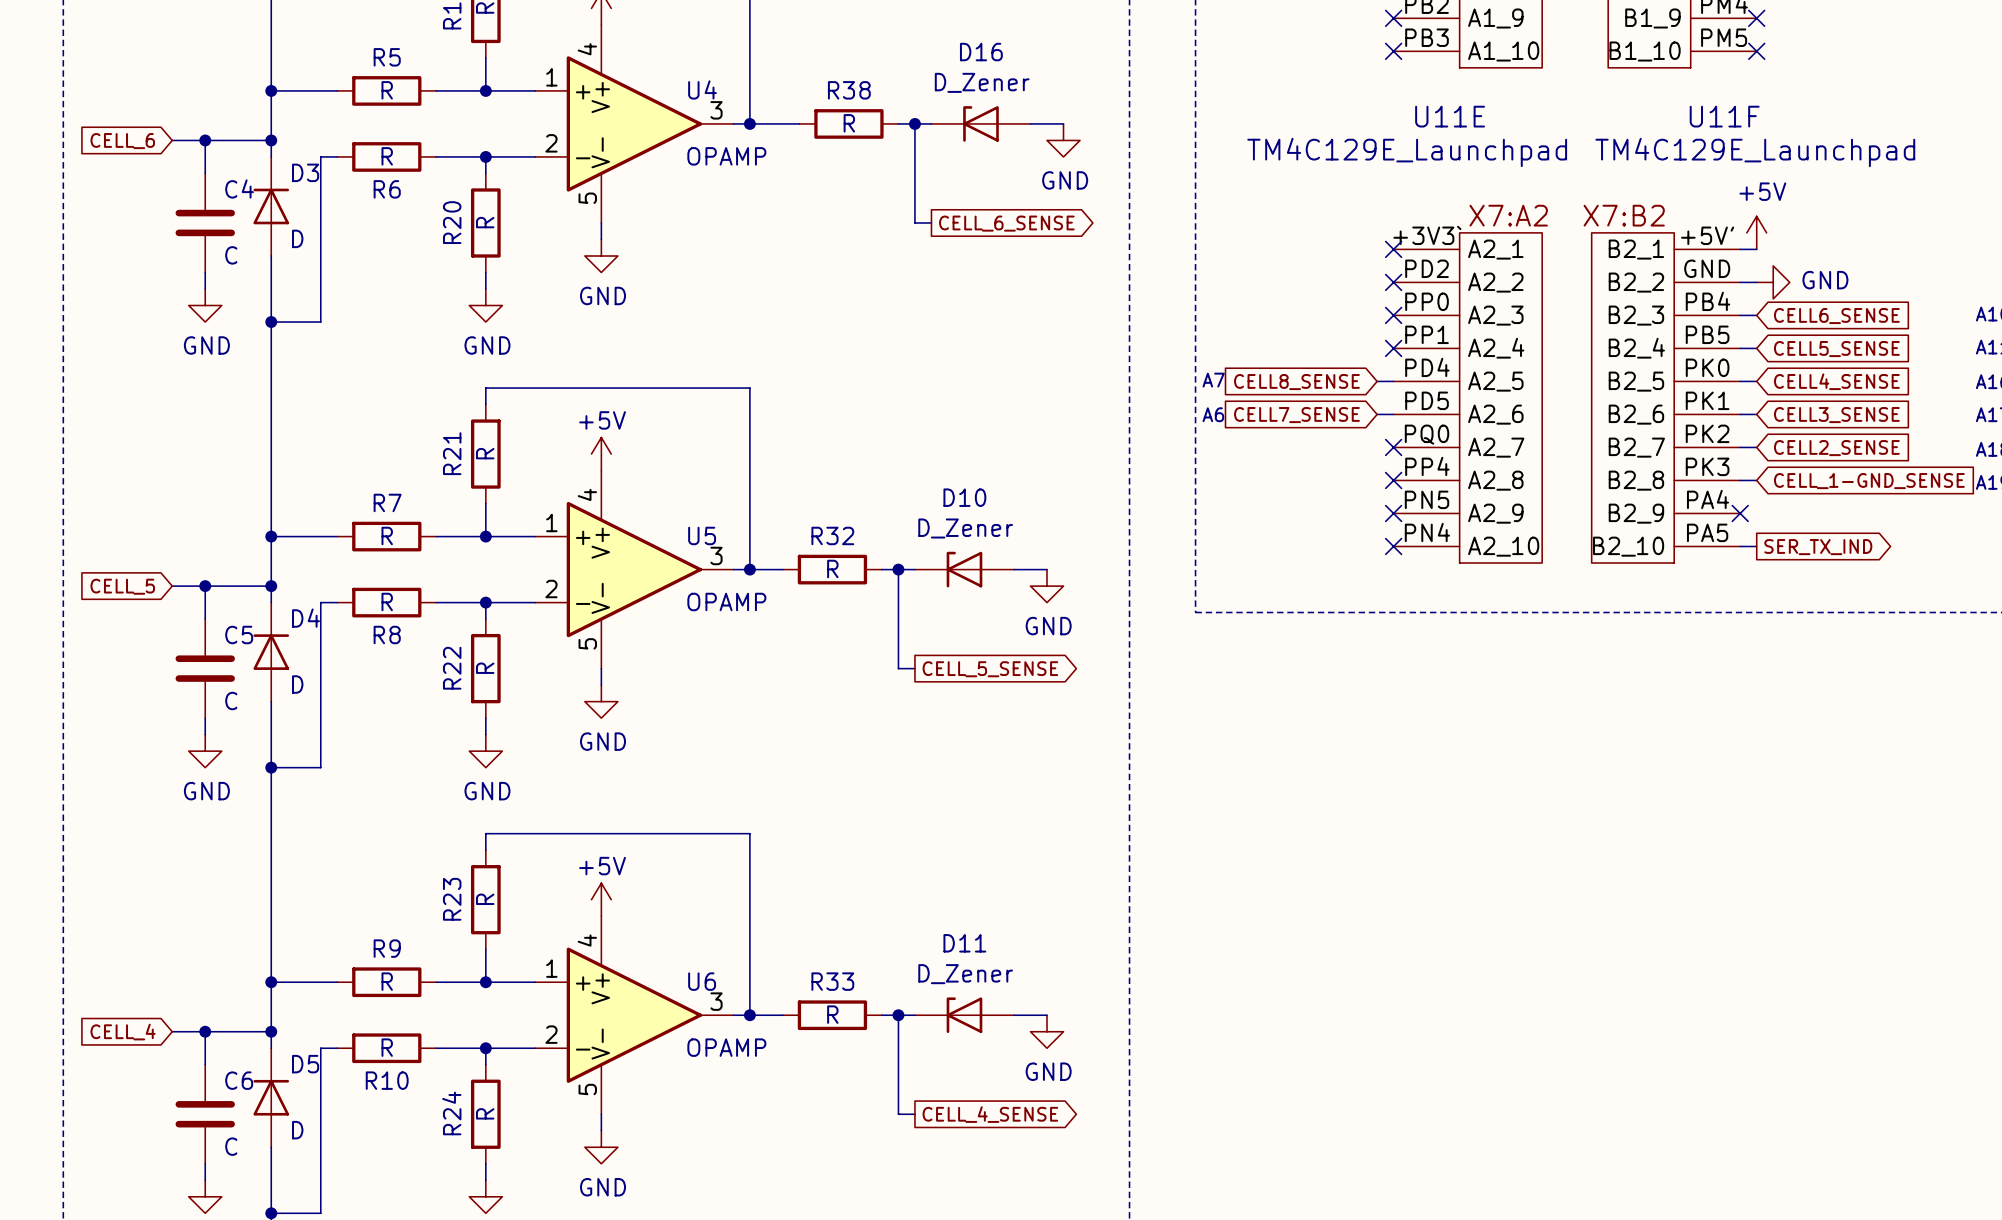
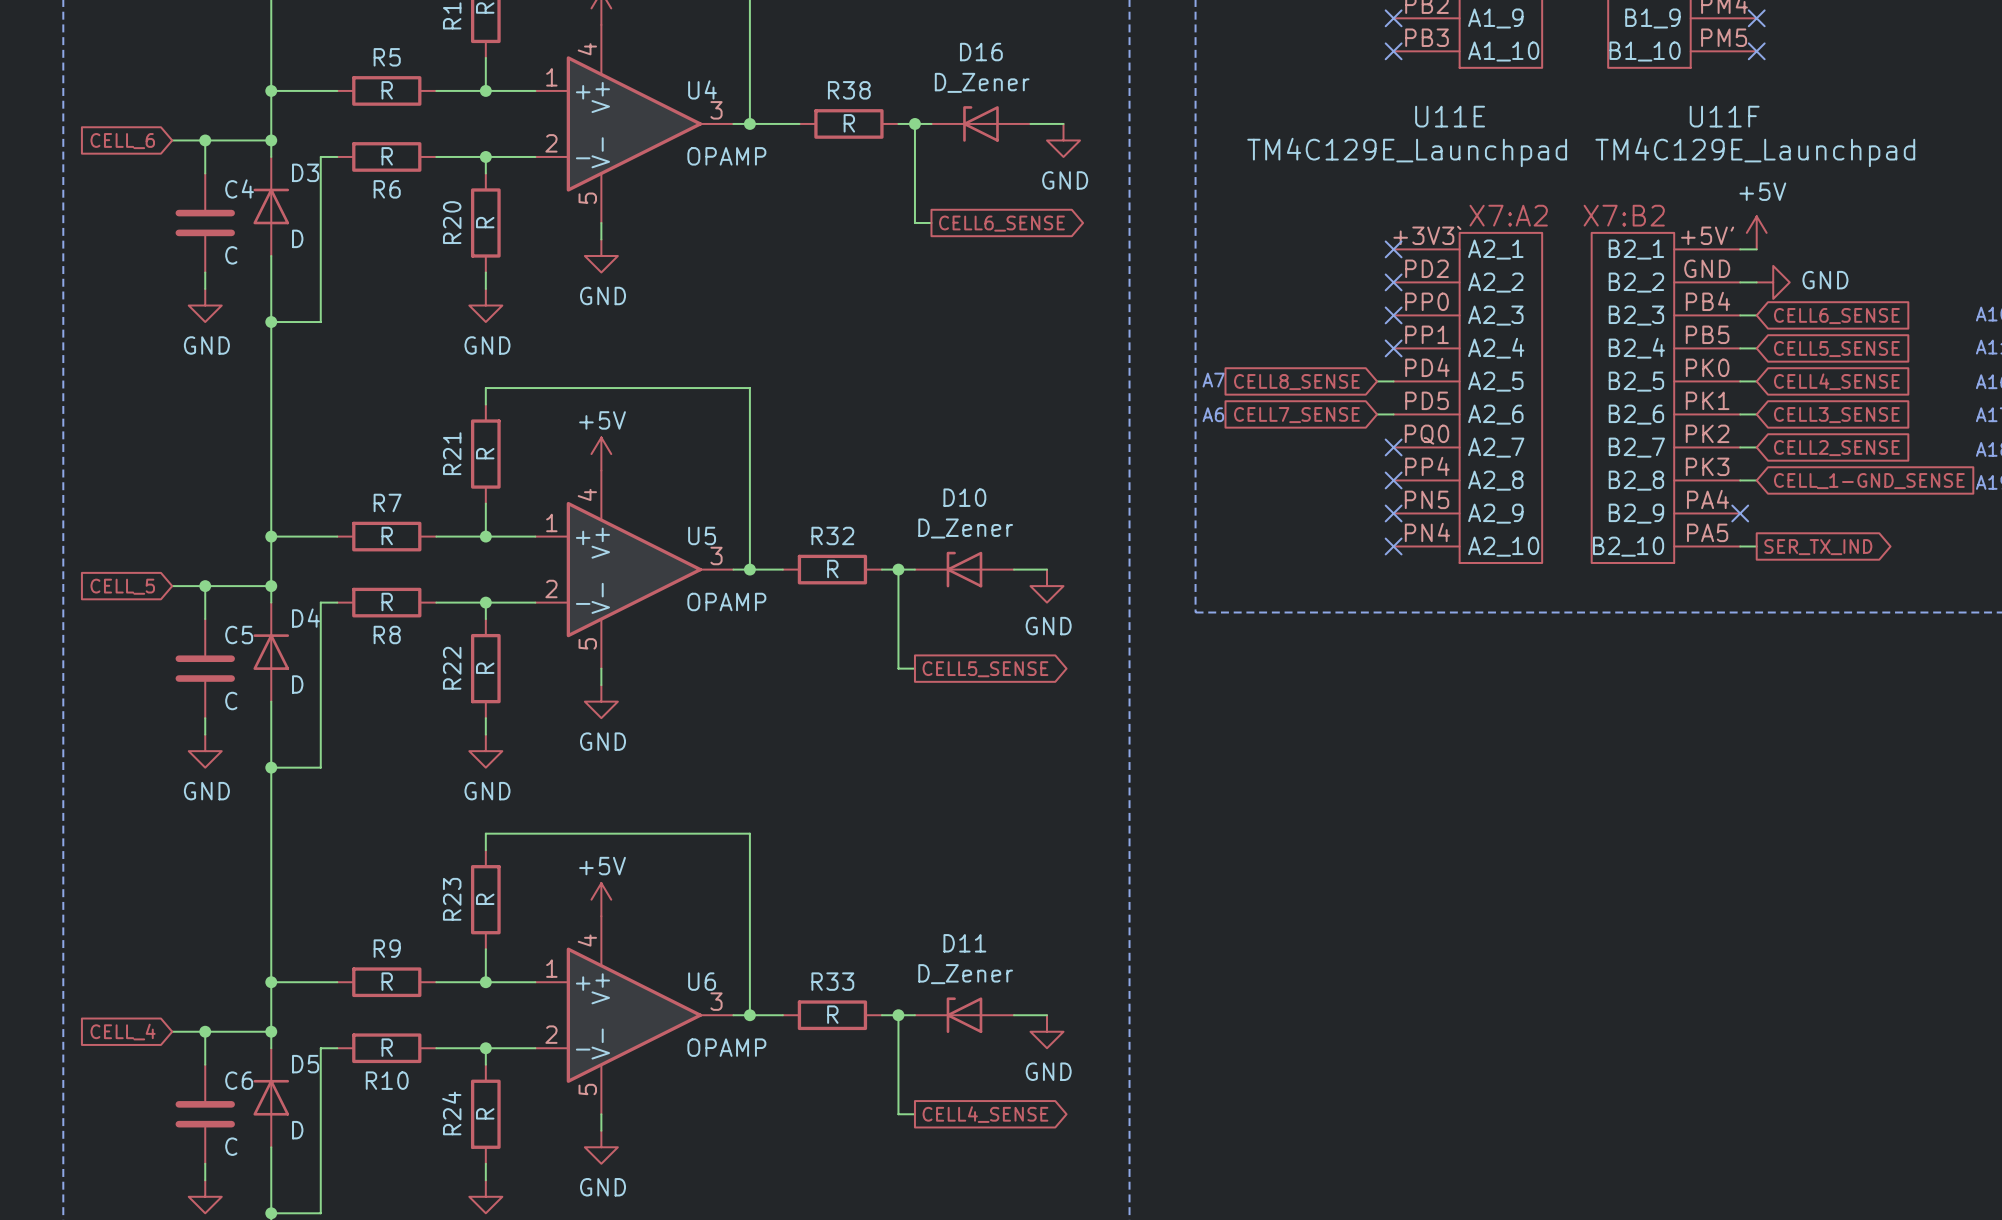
global label: CELL_6_SENSE (1006, 223) -> CELL6_SENSE (1001, 223)
global label: CELL_5_SENSE (990, 669) -> CELL5_SENSE (985, 669)
global label: CELL_4_SENSE (990, 1114) -> CELL4_SENSE (985, 1114)

